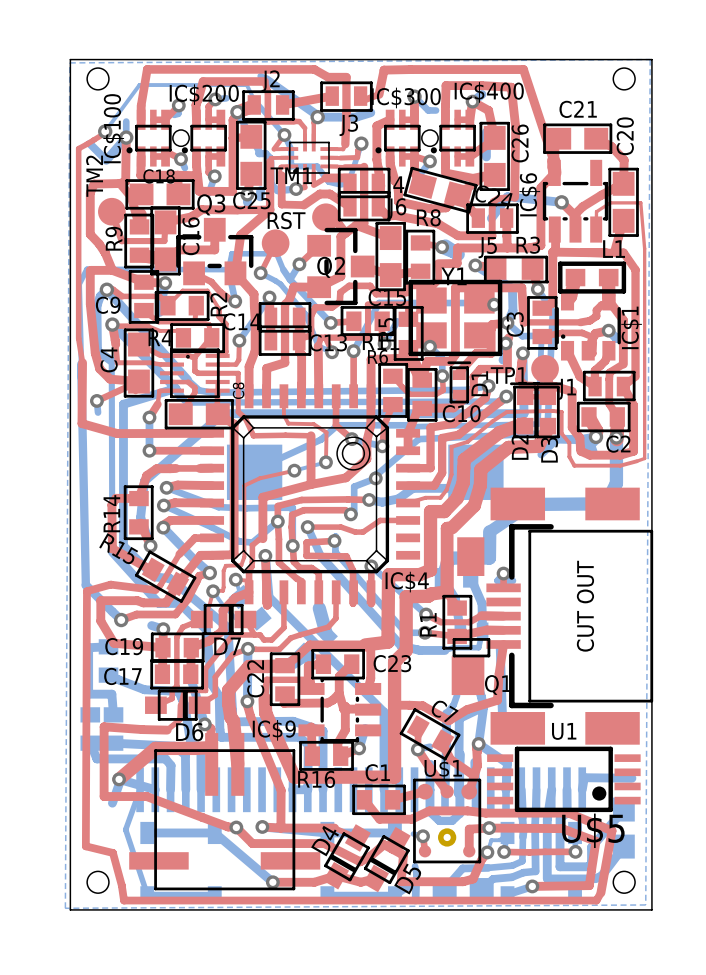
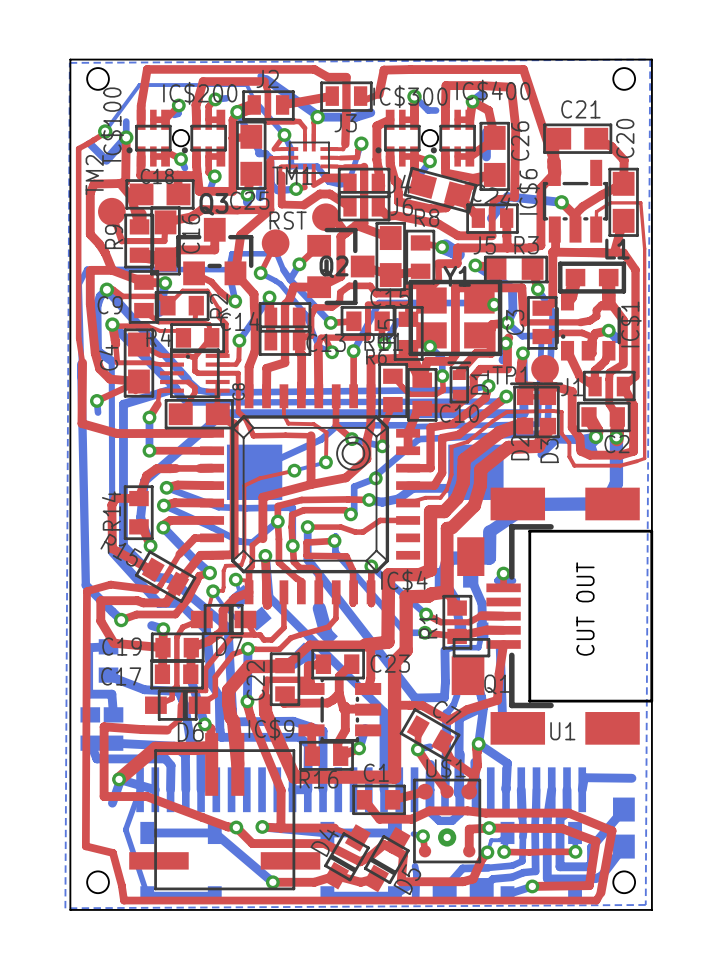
bottom track: (307, 527) (320, 556) (401, 646) (420, 650) (444, 650) -> (307, 527) (307, 559) (415, 698) (444, 697) (444, 650)
U$5: (563, 779) -> none

